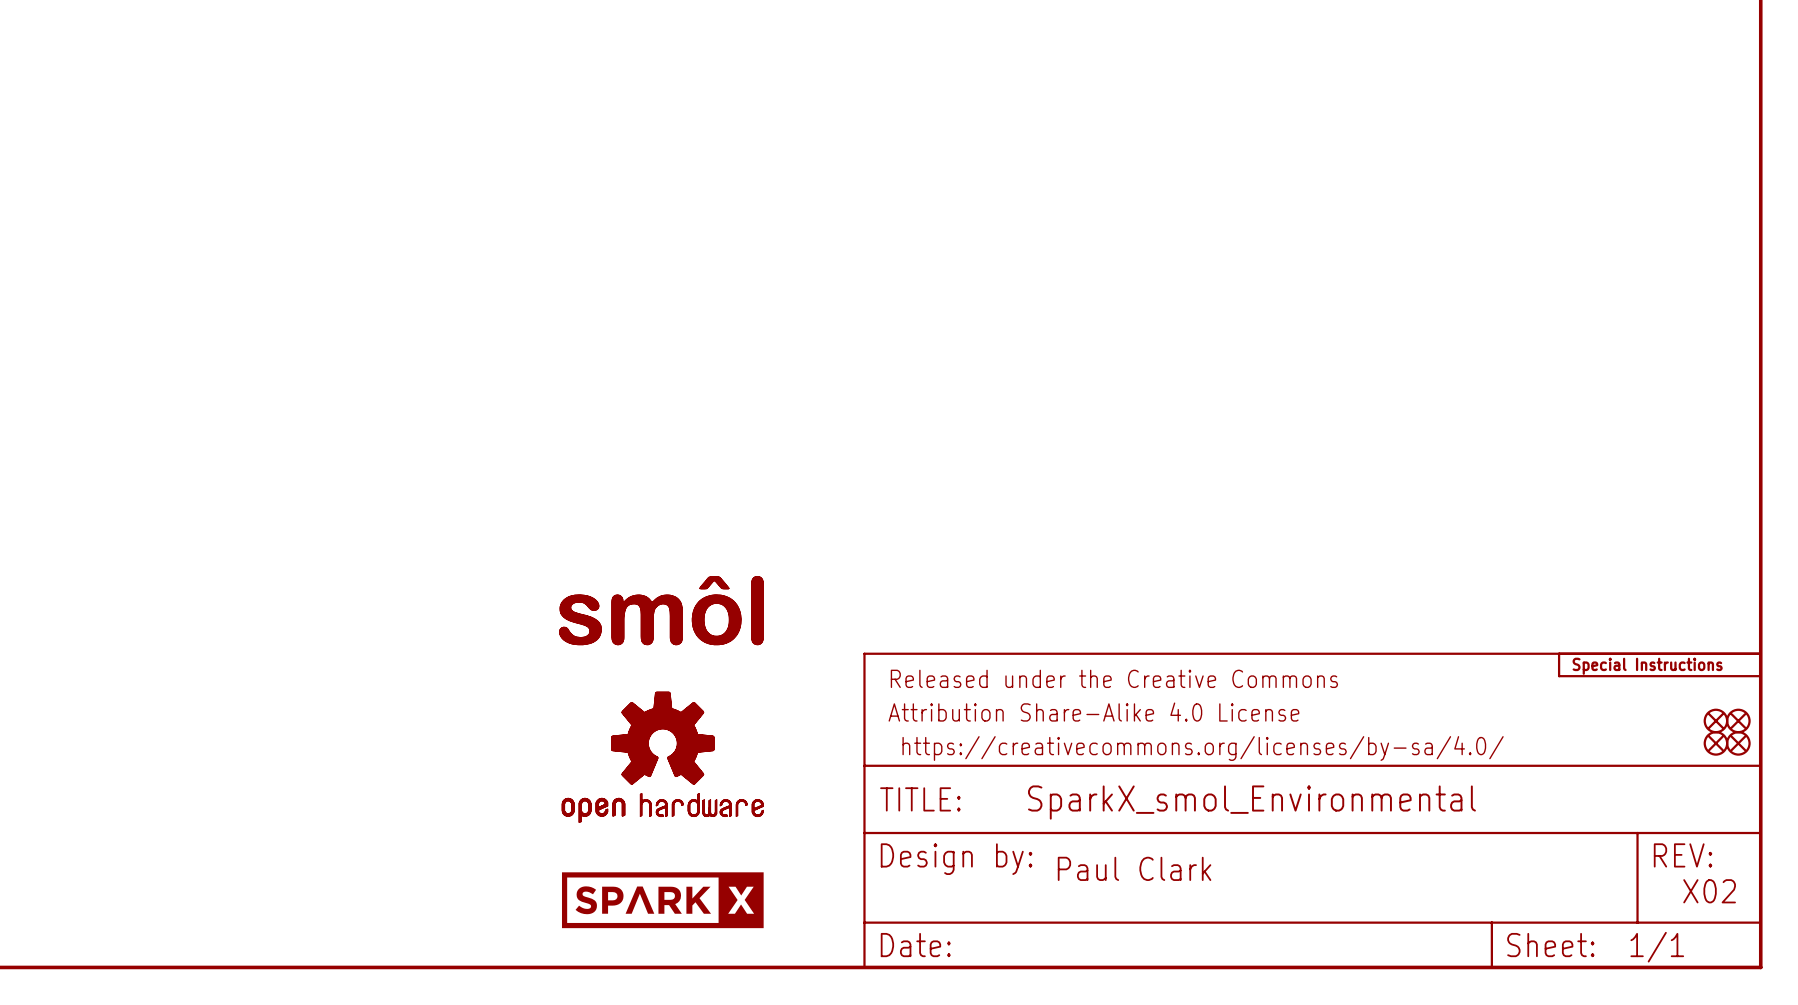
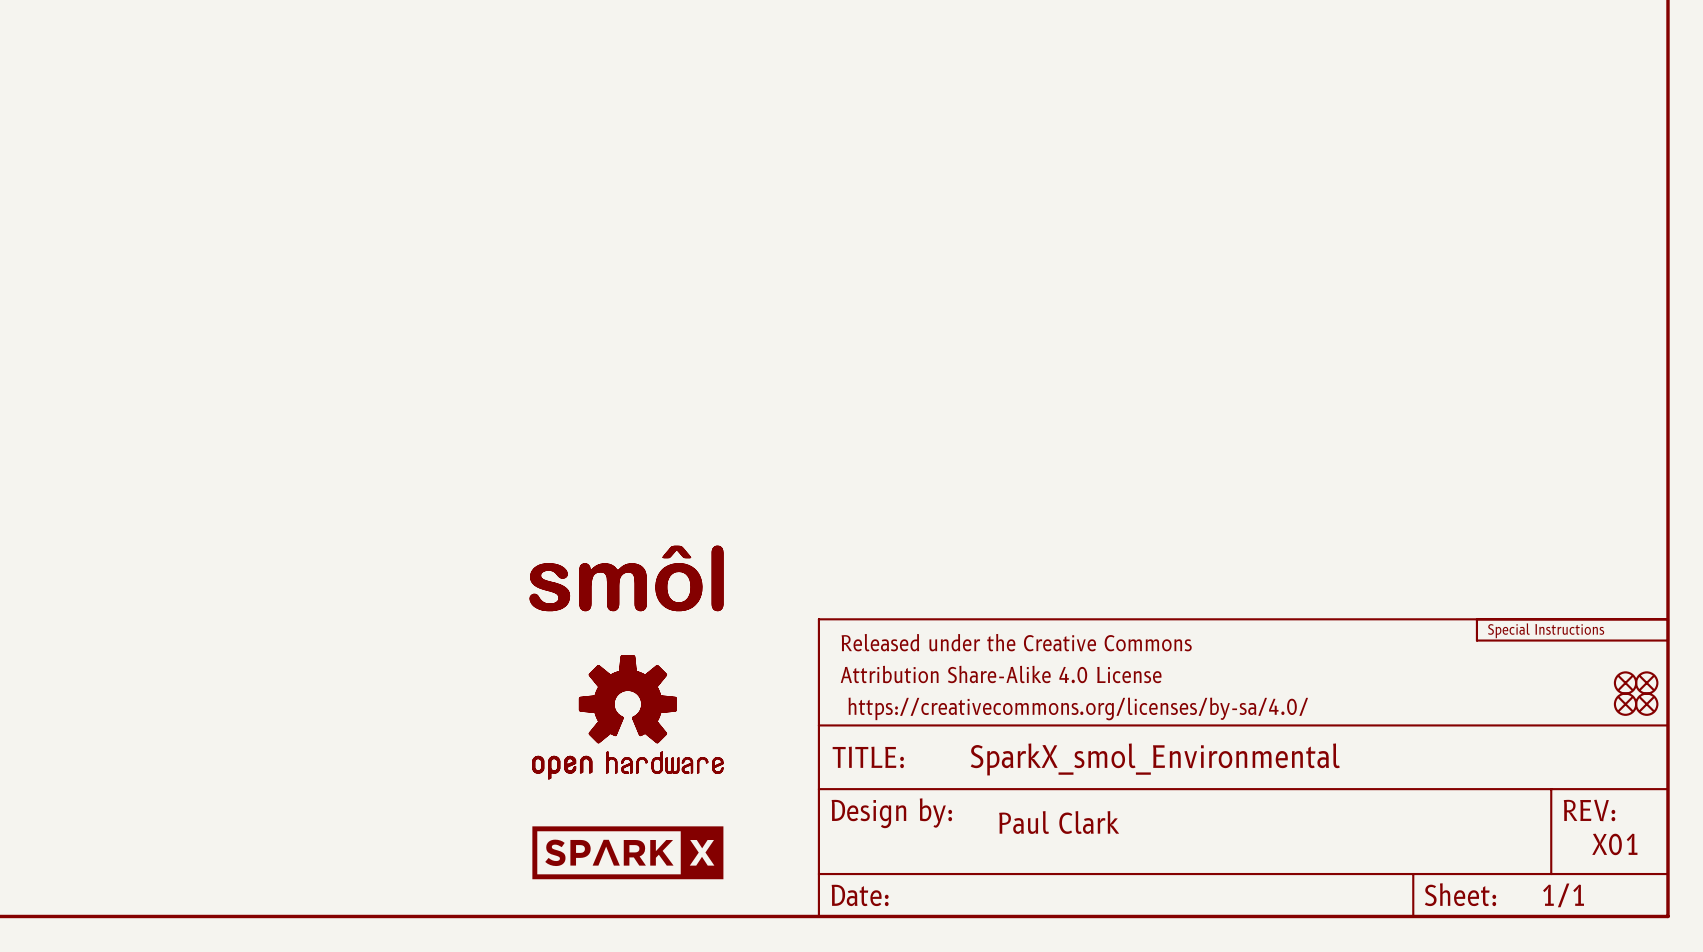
text: X02 (1709, 891) -> X01 (1614, 844)

